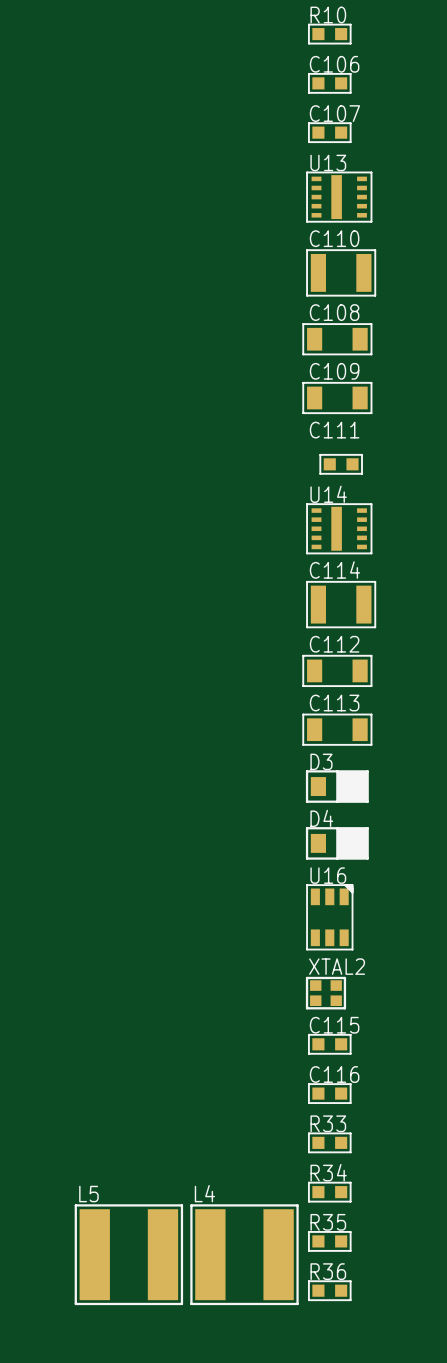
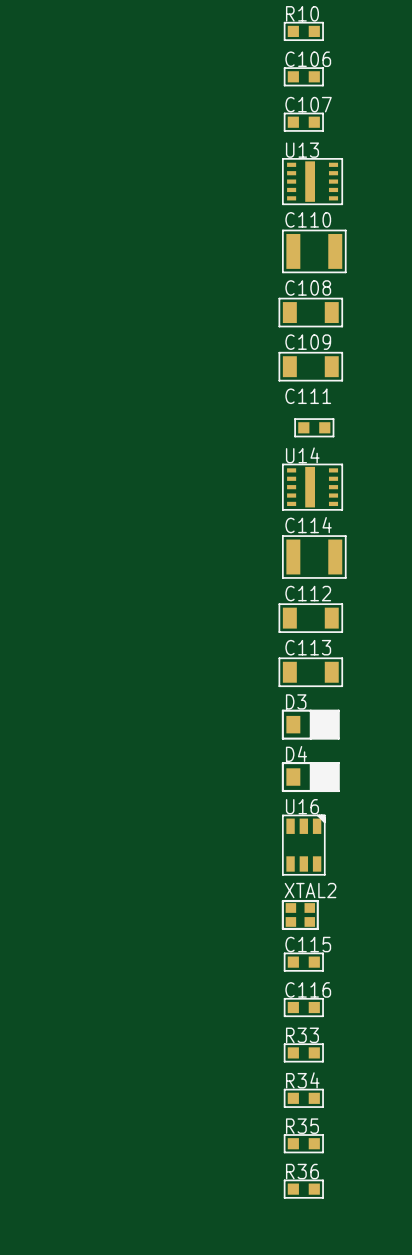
L5: (128, 1254) -> none
L4: (244, 1254) -> none

